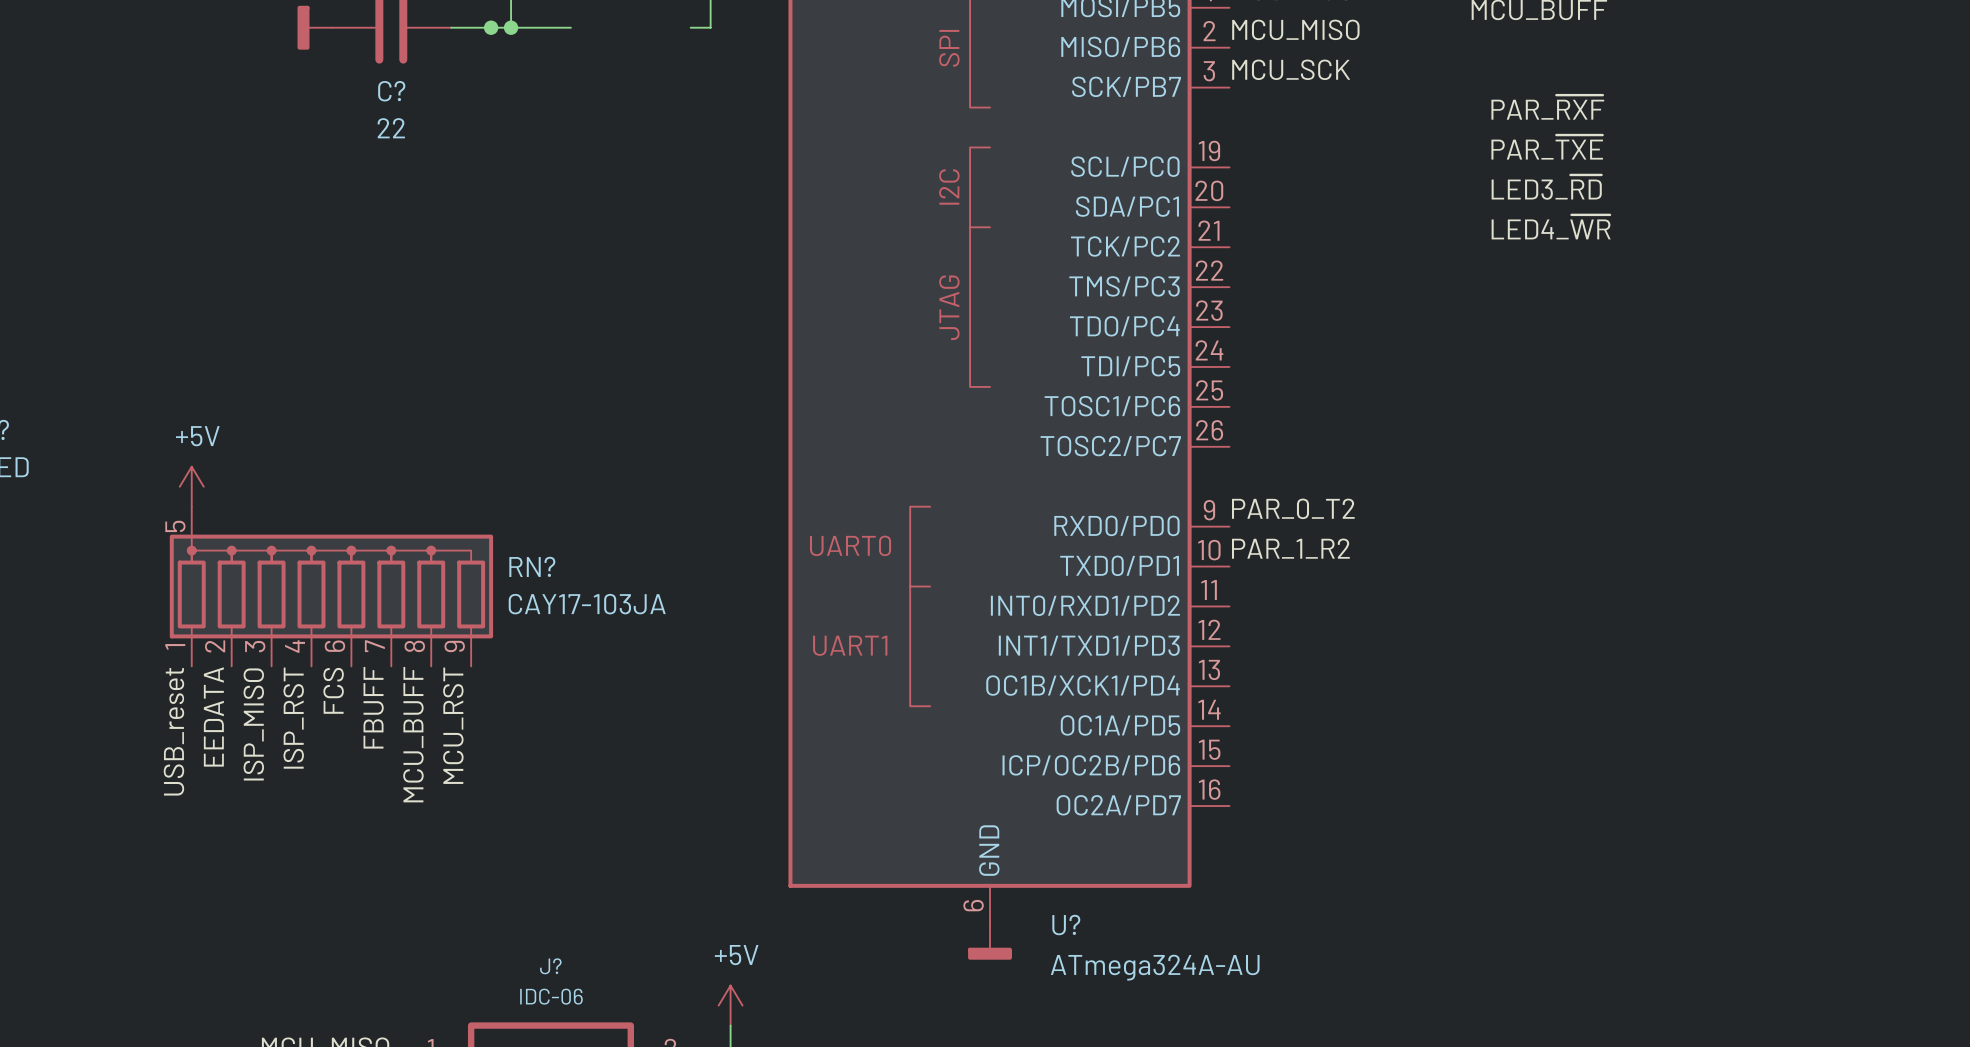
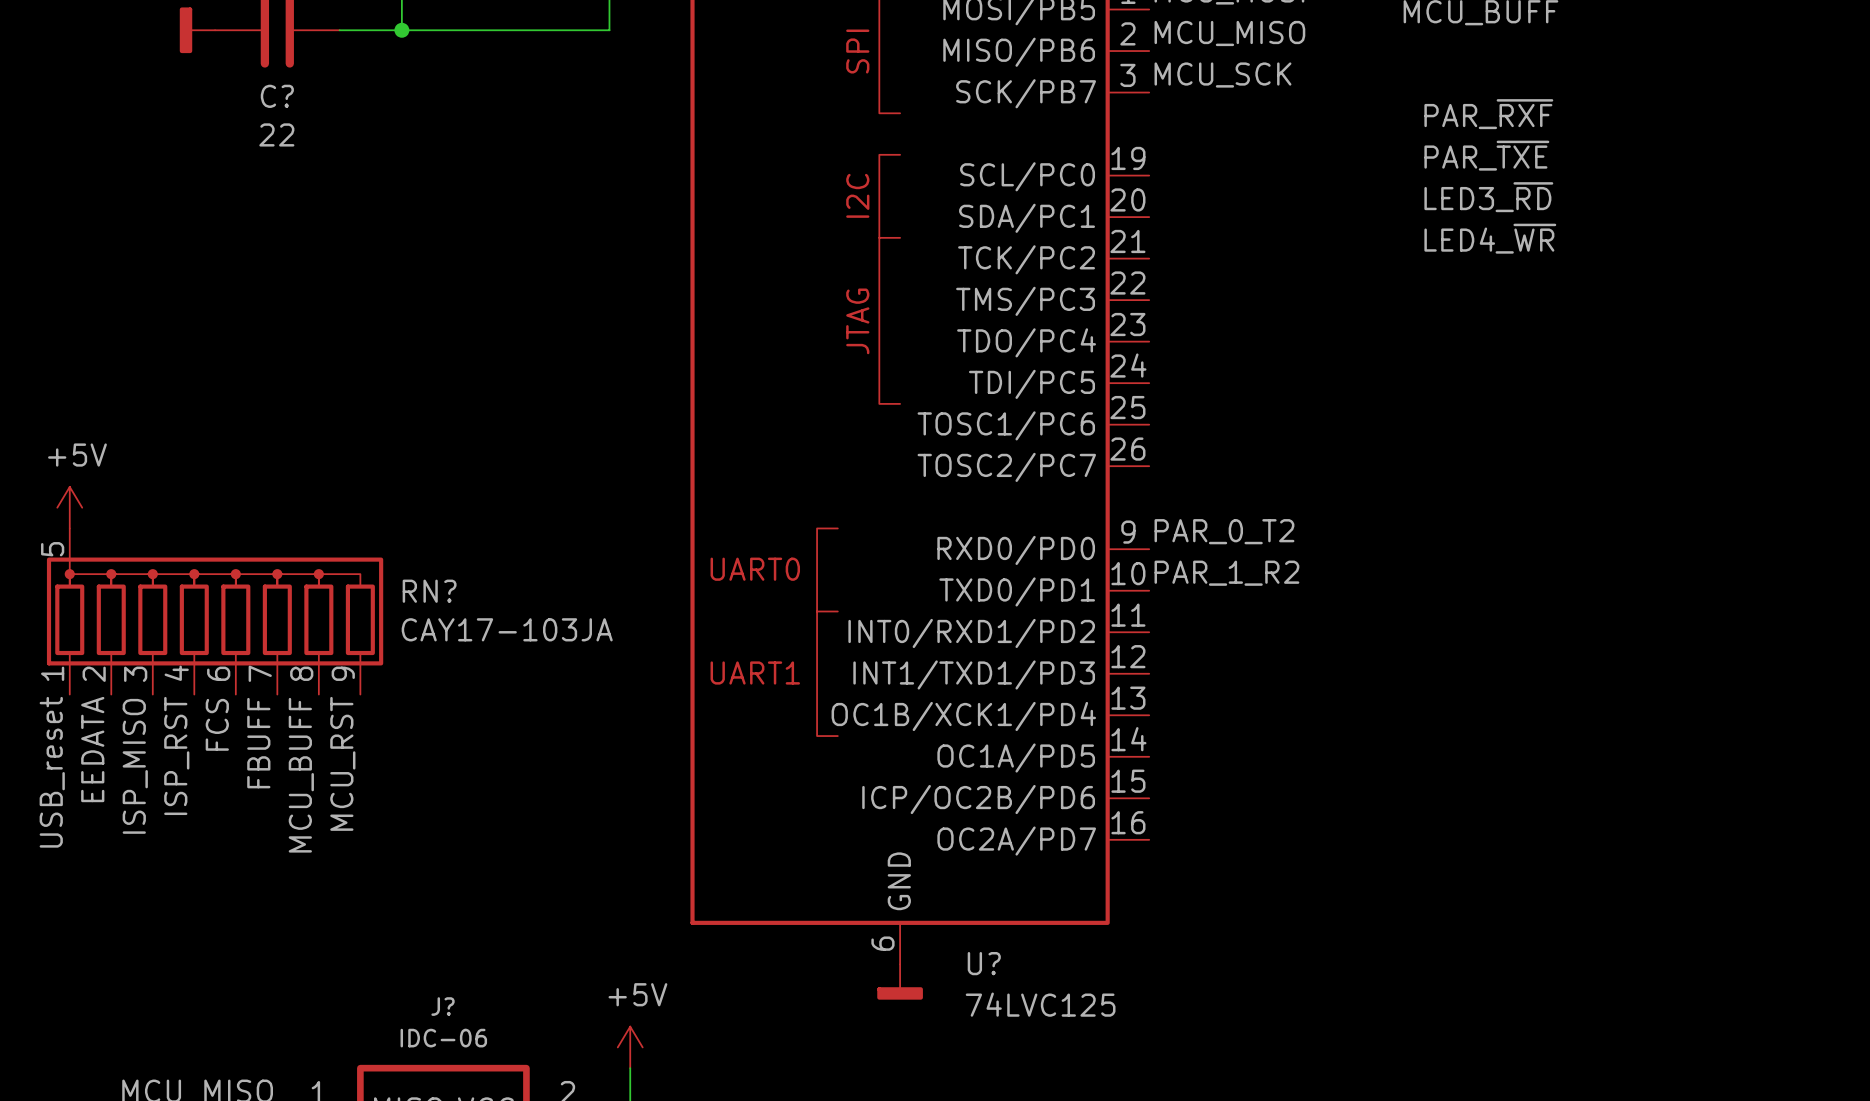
junction: (491, 27) -> none
wire: none -> (464, 30) (588, 30)
U? value: ATmega324A-AU (1155, 967) -> 74LVC125 (1040, 1004)

